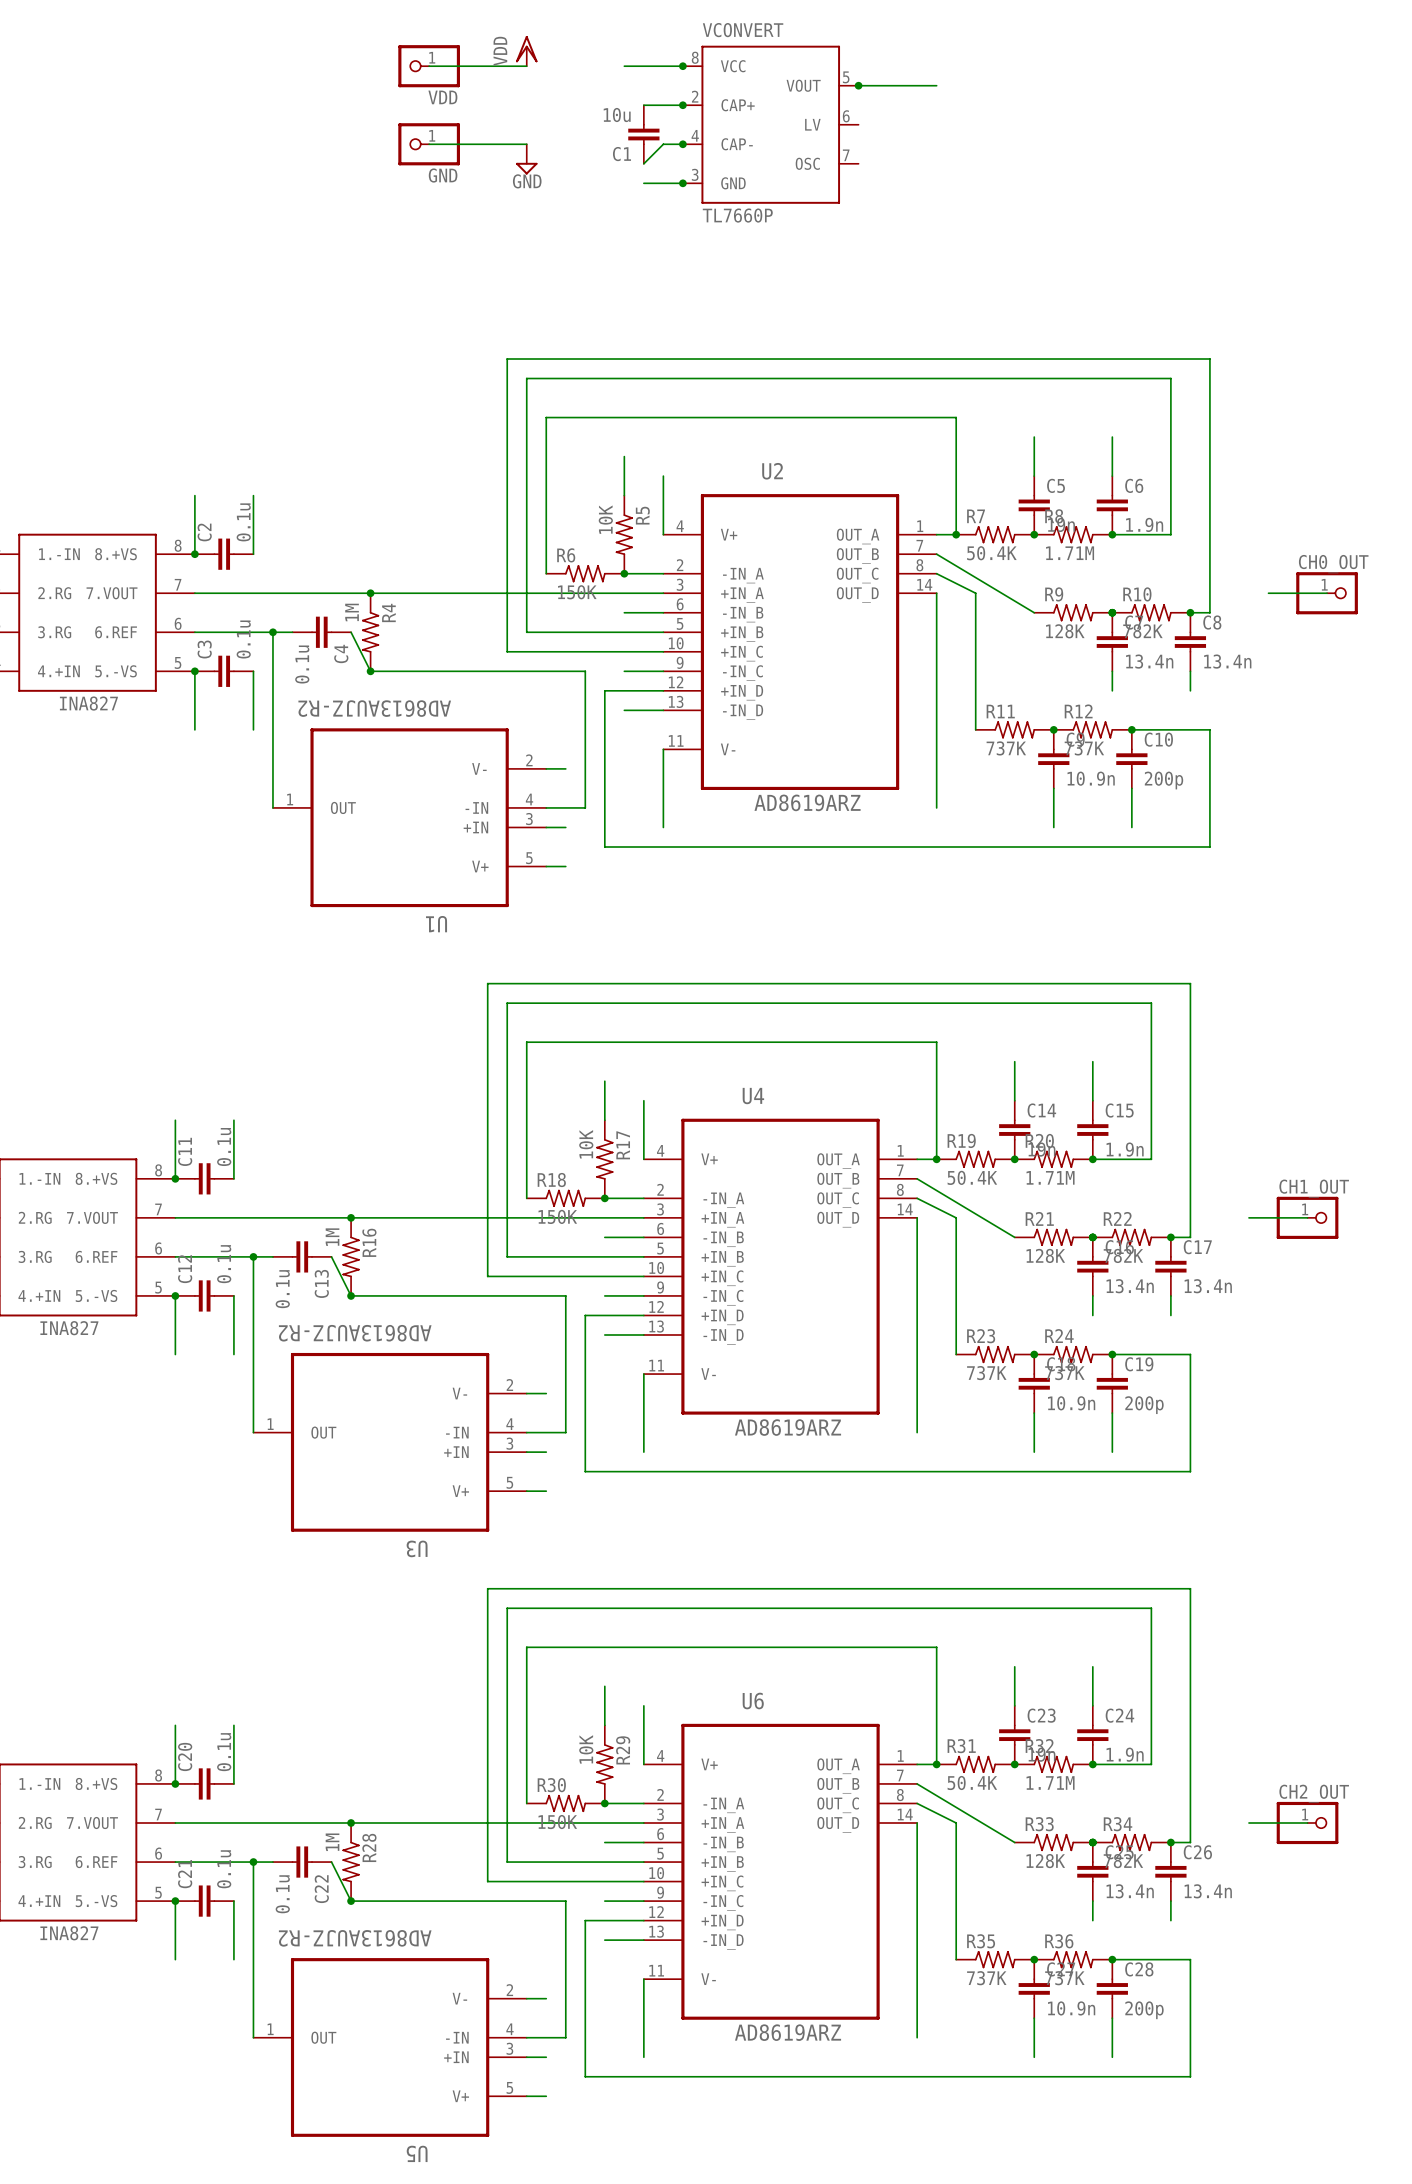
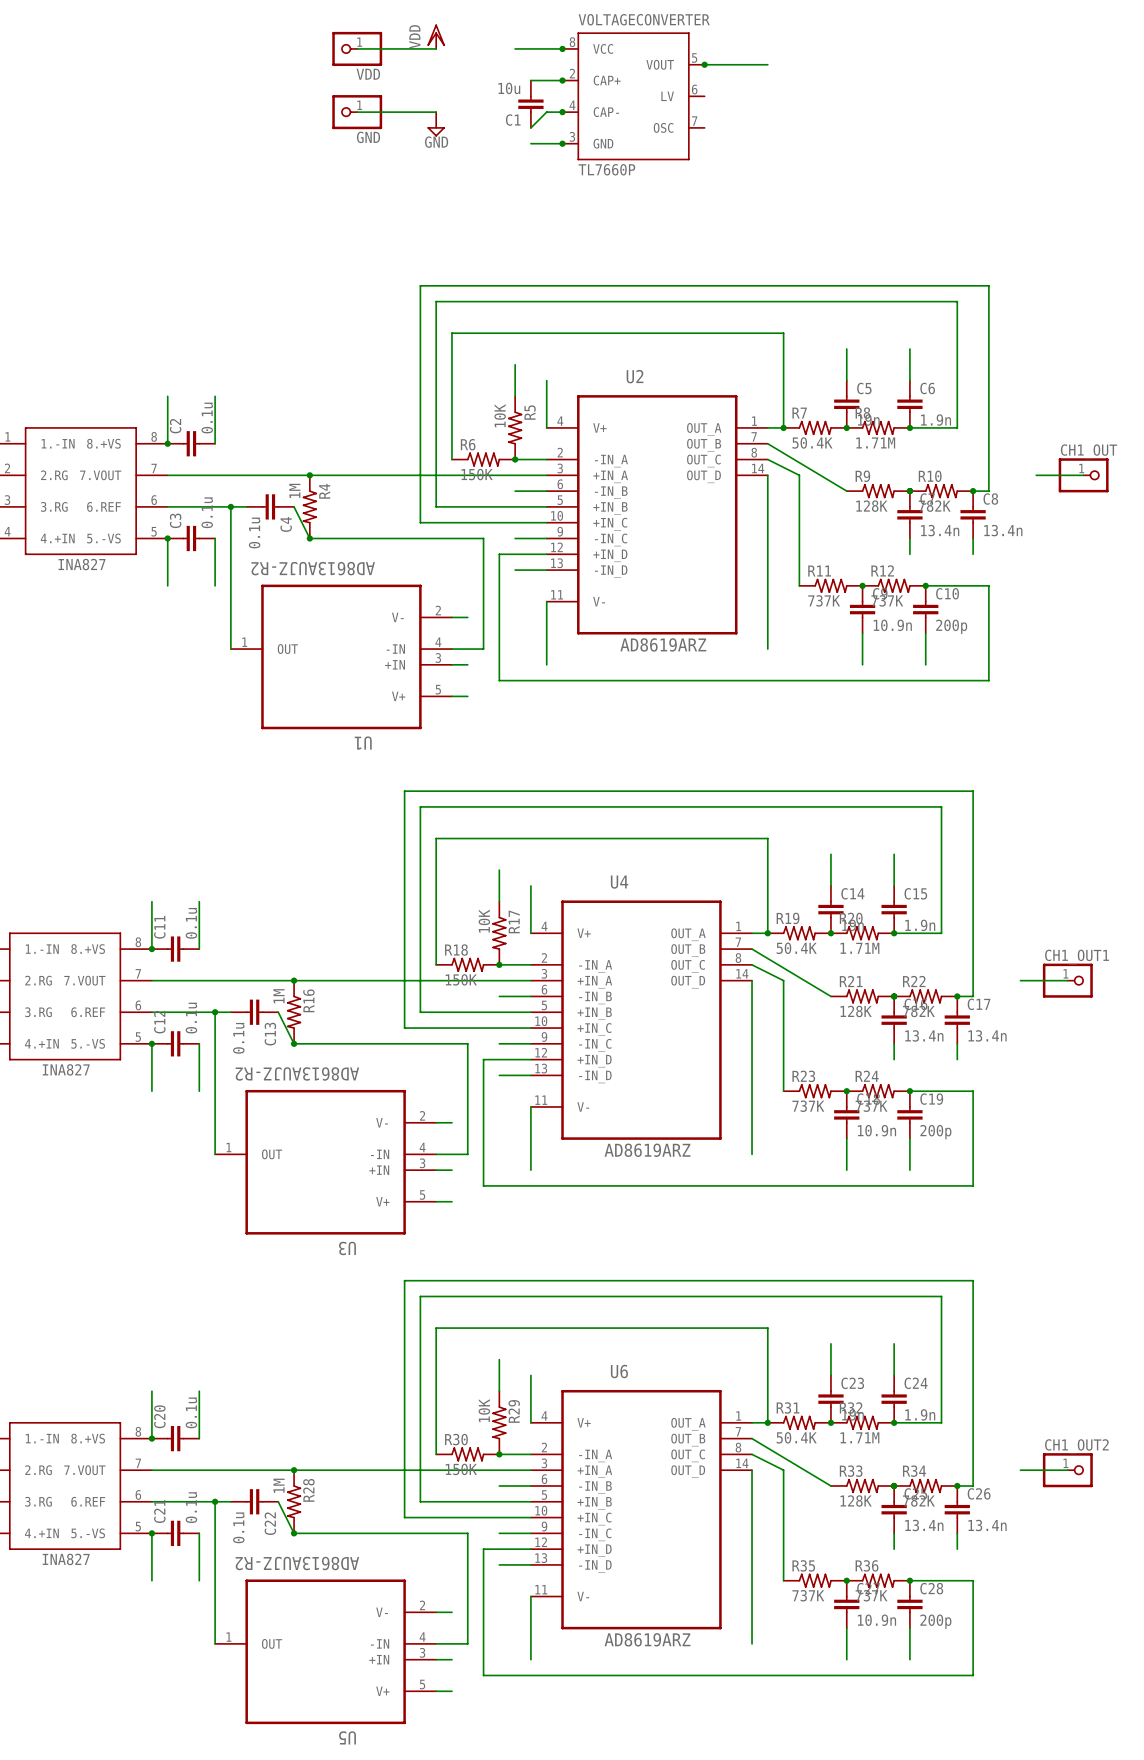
VCONVERT name: VCONVERT (743, 30) -> VOLTAGECONVERTER (644, 19)
CH0_OUT name: CH0_OUT (1333, 564) -> CH1_OUT (1089, 451)
CH1_OUT name: CH1_OUT (1314, 1188) -> CH1_OUT1 (1077, 957)
CH2_OUT name: CH2_OUT (1314, 1793) -> CH1_OUT2 (1076, 1446)

